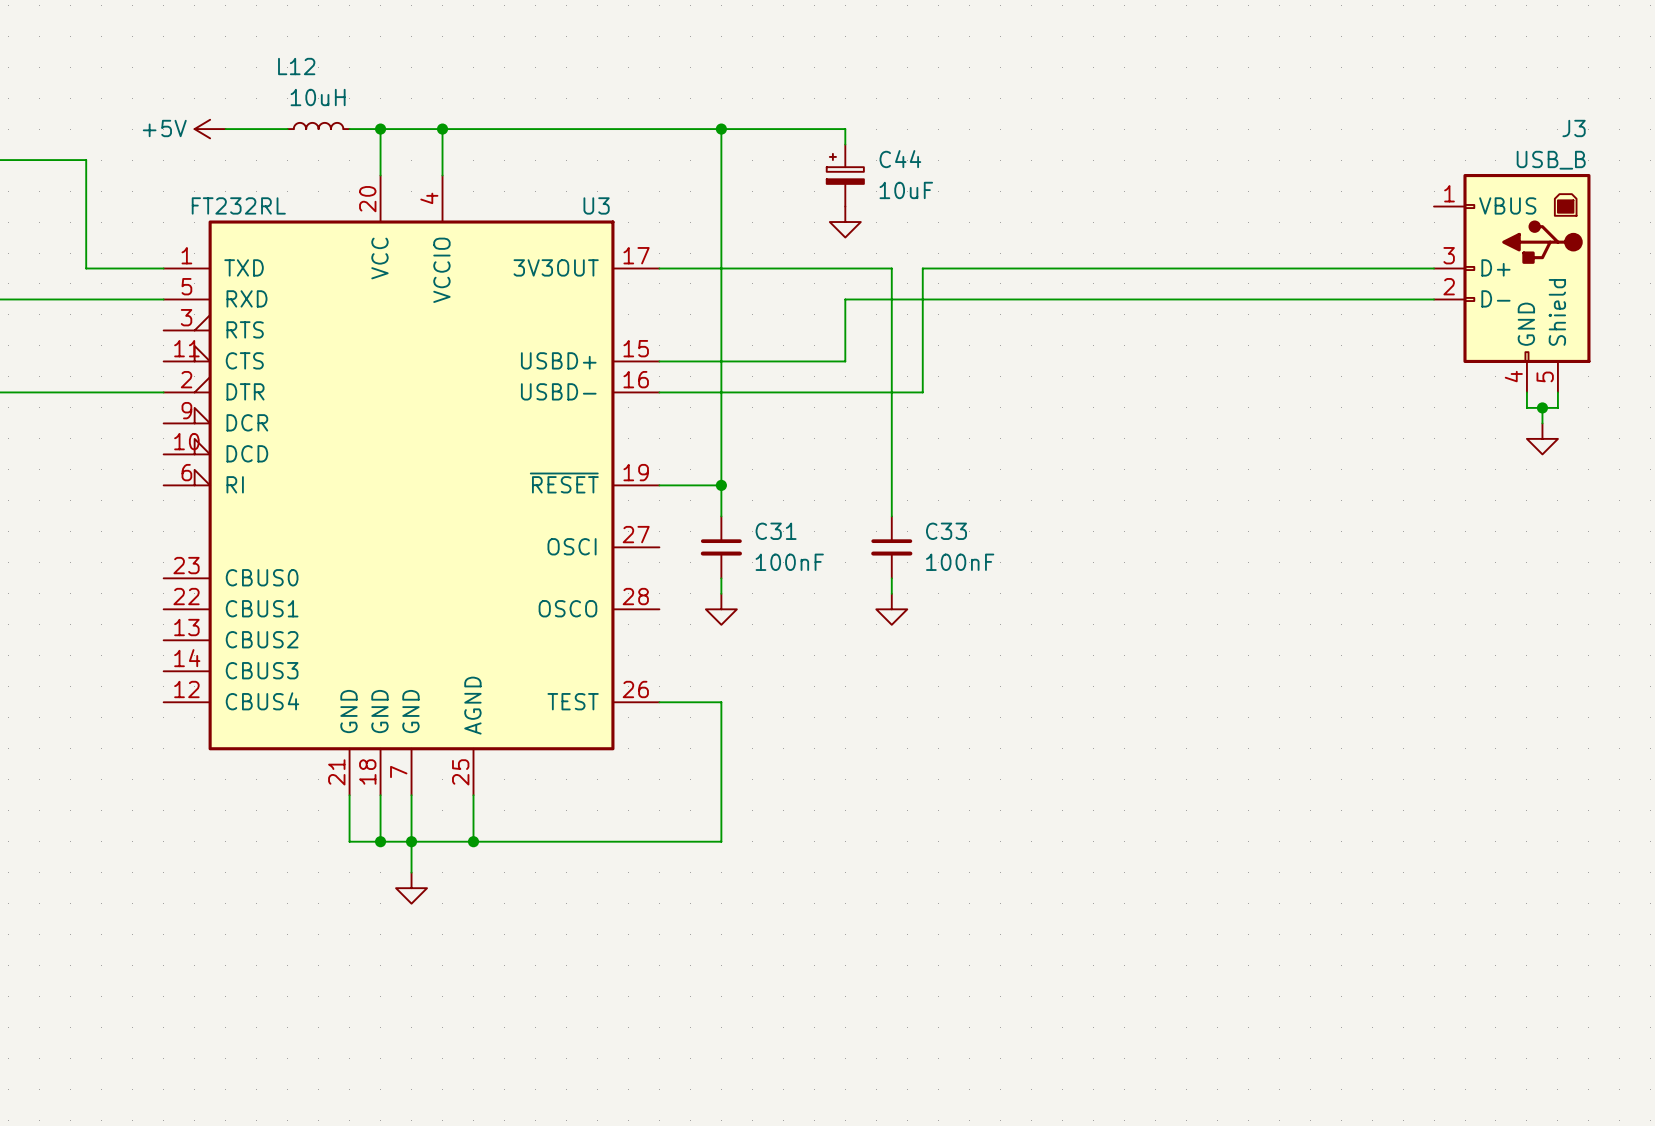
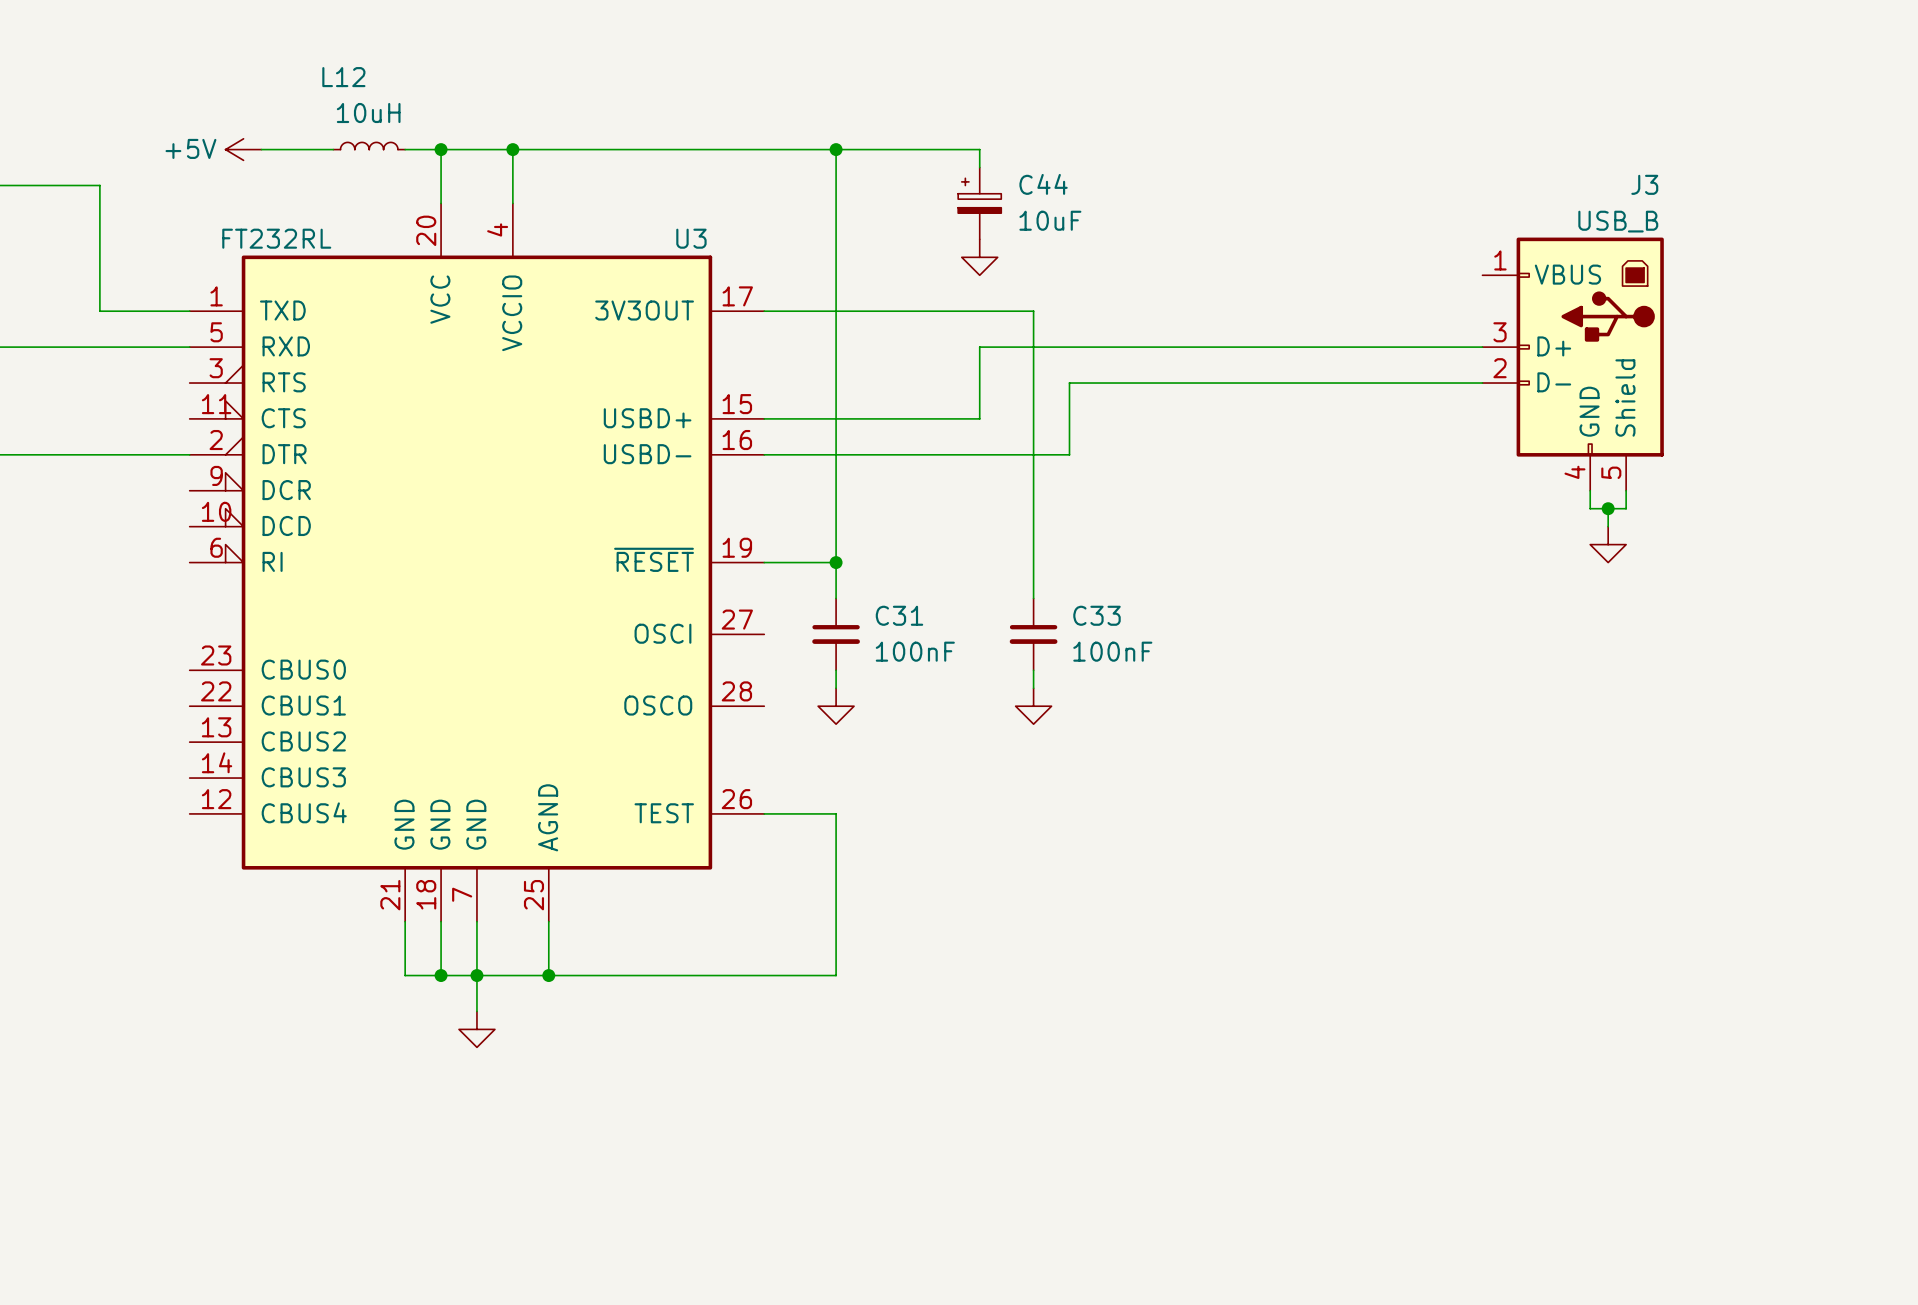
wire: (1434, 268) (922, 268) (922, 330) -> (1482, 383) (1069, 383)
J3 position: (1512, 283) -> (1573, 364)
wire: (1526, 392) (1526, 407) (1557, 407) (1557, 392) -> (1590, 490) (1590, 508) (1626, 508) (1626, 490)
wire: (1542, 407) (1542, 423) -> (1608, 508) (1608, 526)
junction: (1542, 407) -> none
junction: none -> (1608, 508)
power symbol position: (1542, 438) -> (1608, 544)

